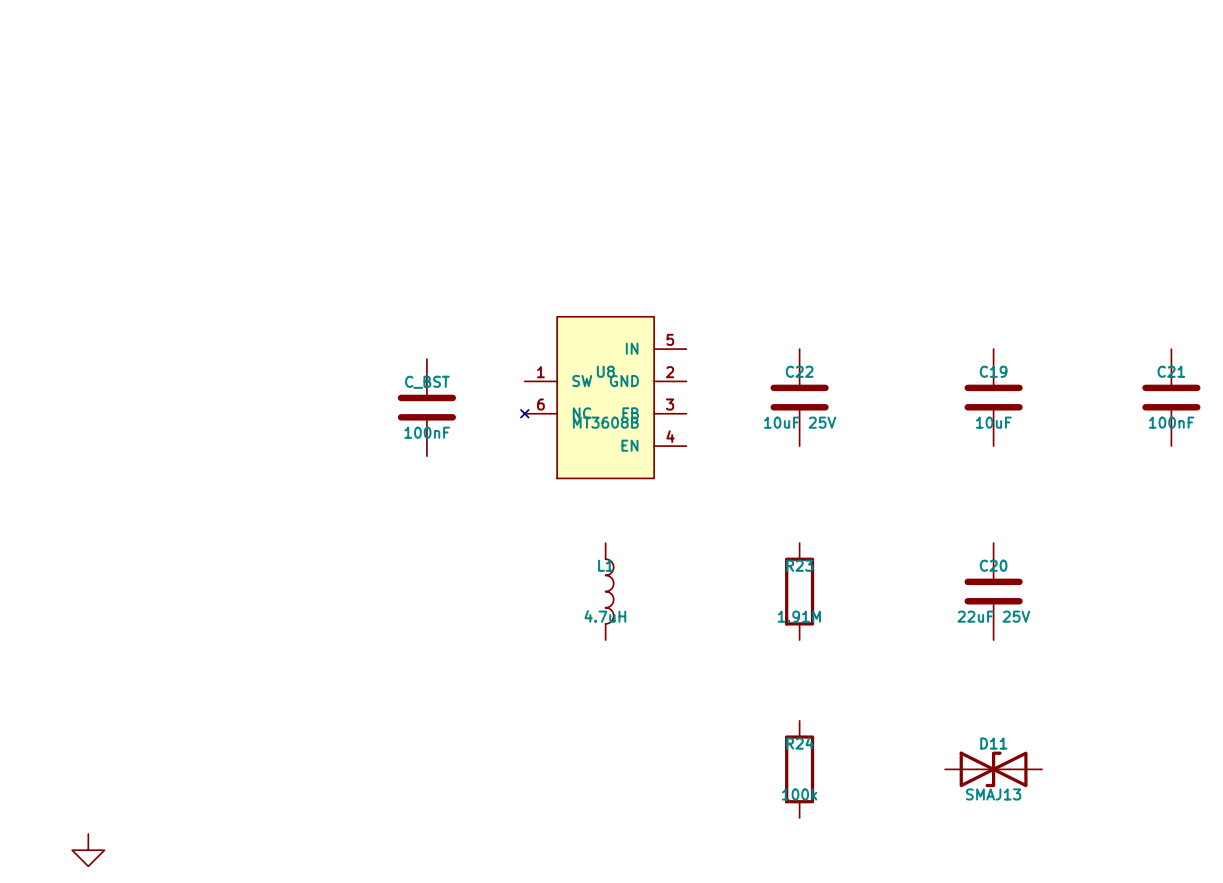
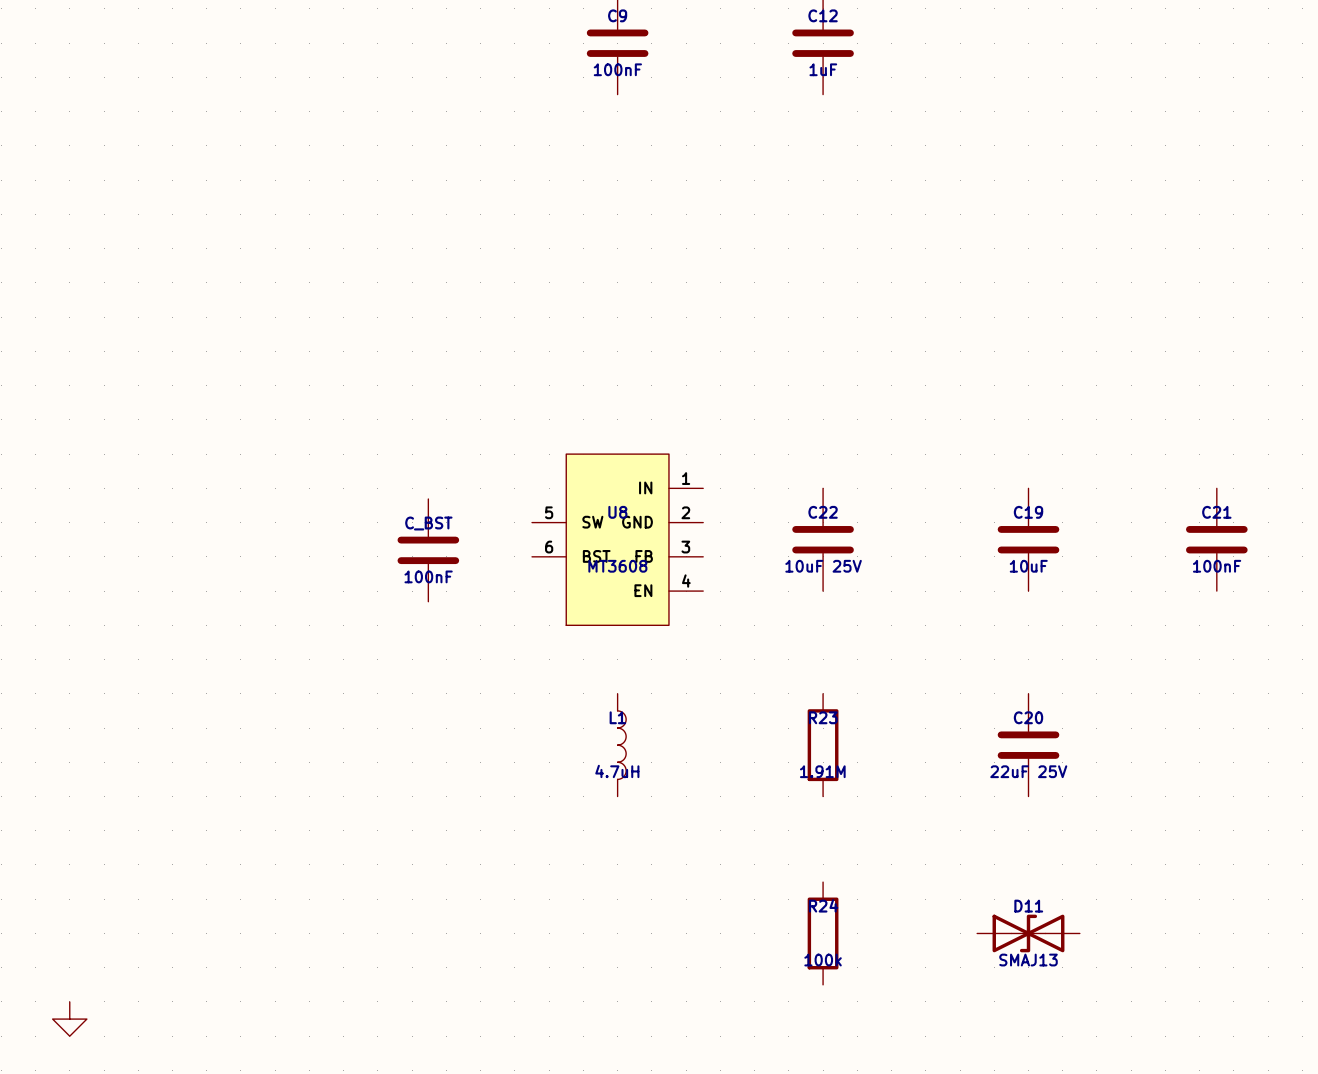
U8 symbol: [520, 316, 687, 479] -> [532, 454, 704, 626]
U8 value: MT3608B (605, 422) -> MT3608 (617, 566)

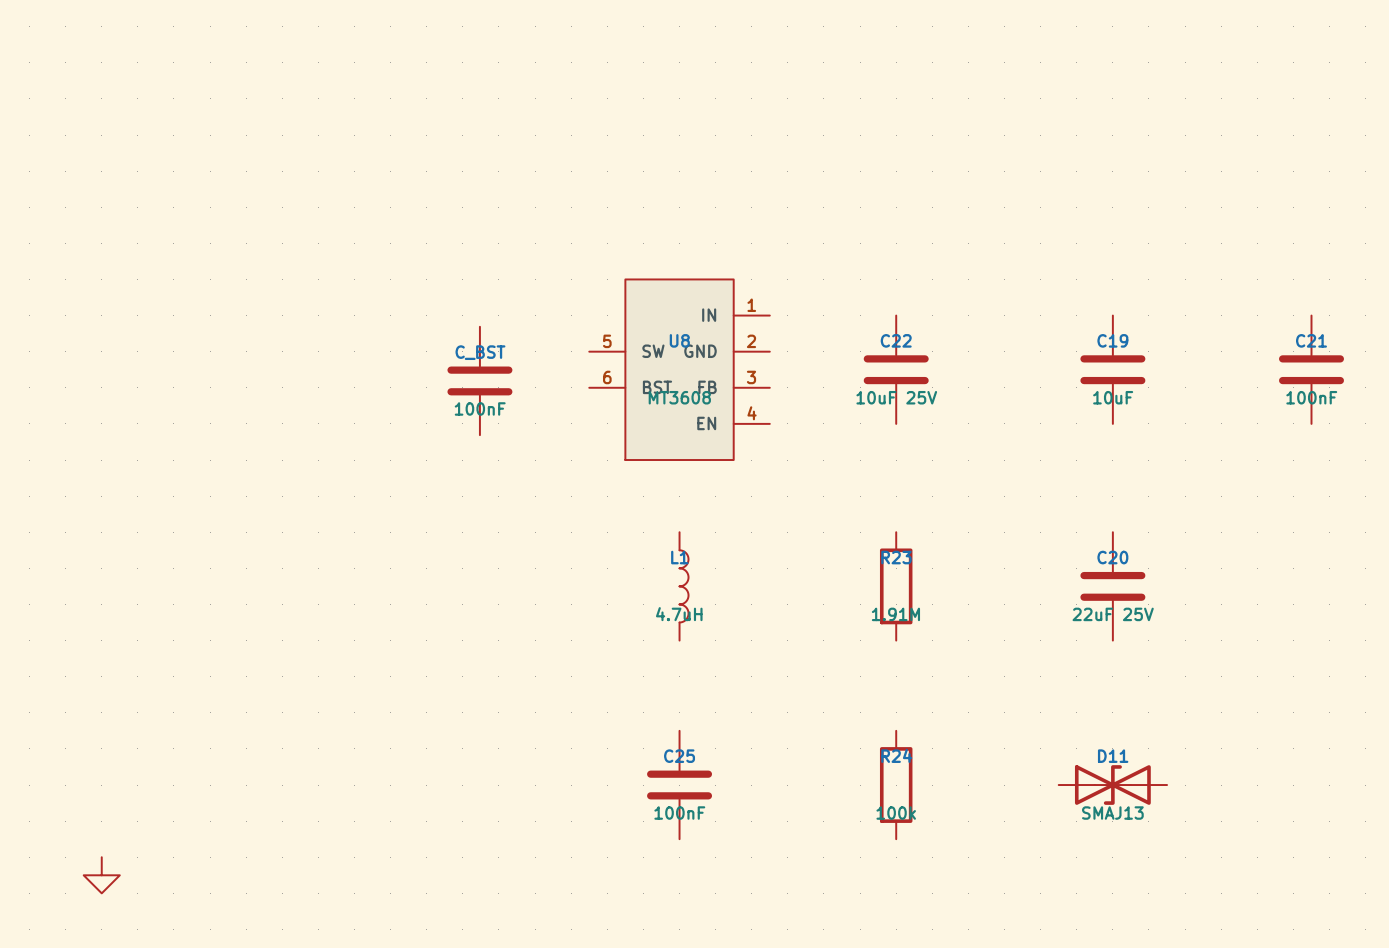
C25: none -> 100nF (679, 785)

